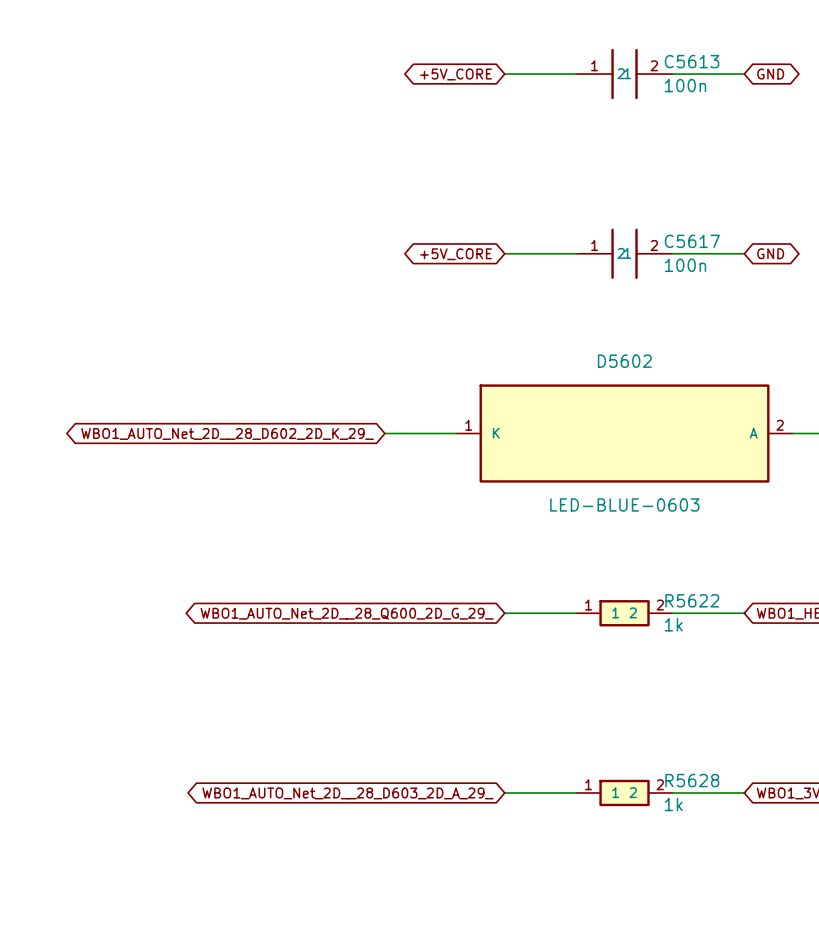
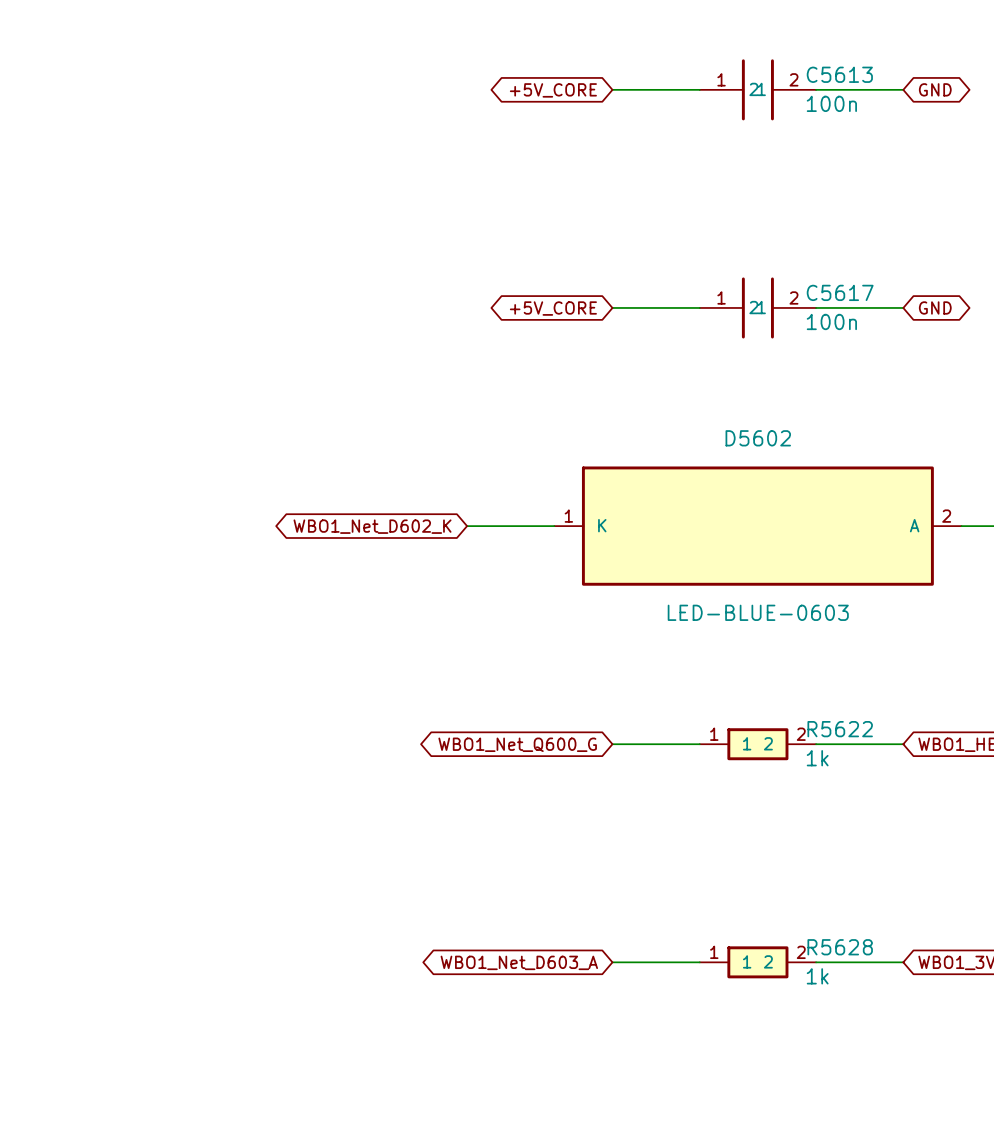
global label: WBO1_AUTO_Net_2D__28_D602_2D_K_29_ (227, 433) -> WBO1_Net_D602_K (372, 526)
global label: WBO1_AUTO_Net_2D__28_Q600_2D_G_29_ (347, 613) -> WBO1_Net_Q600_G (517, 744)
global label: WBO1_AUTO_Net_2D__28_D603_2D_A_29_ (348, 793) -> WBO1_Net_D603_A (519, 962)

